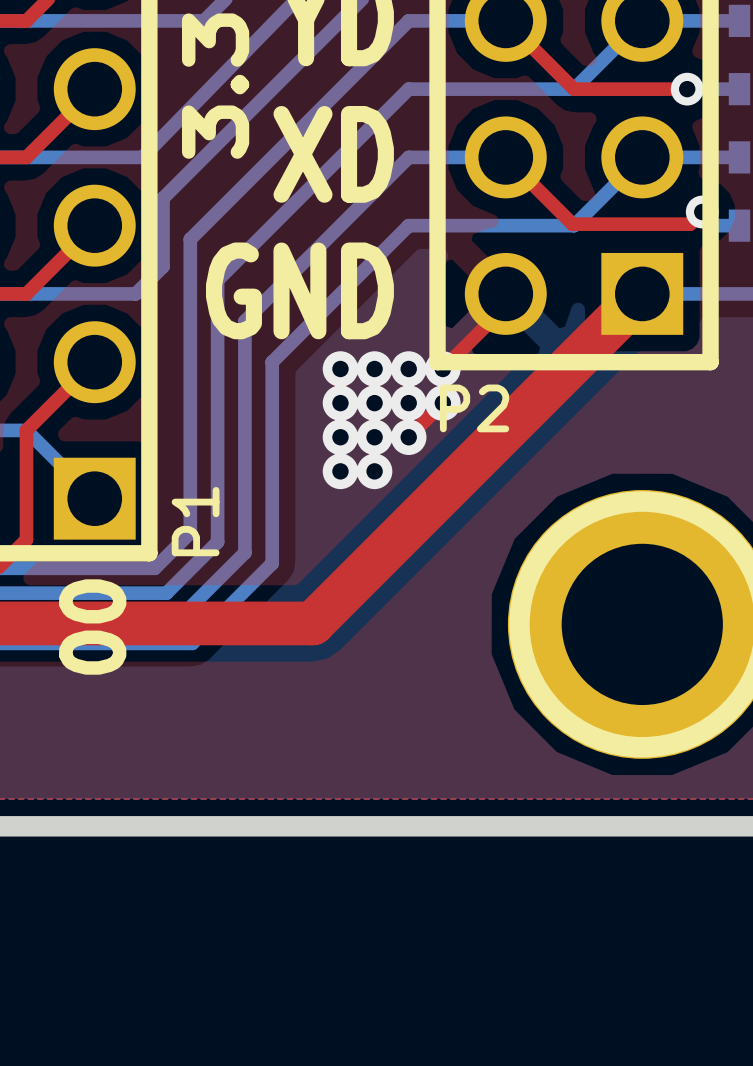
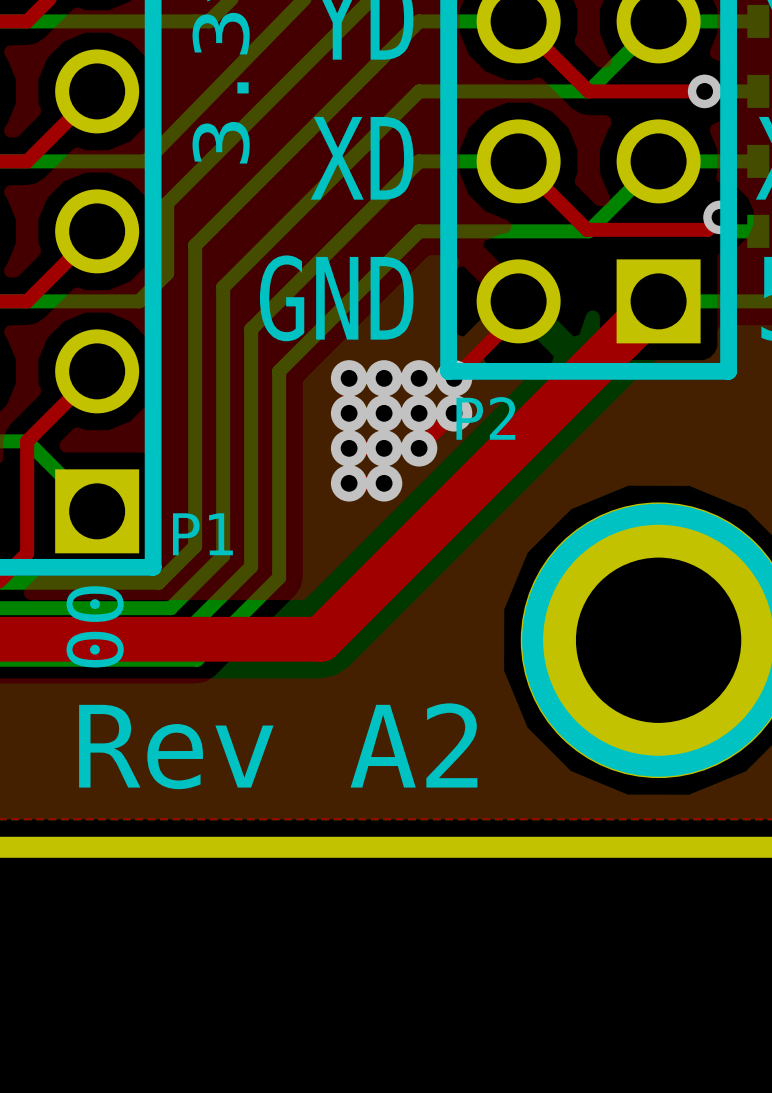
P1 name rotation: 0° (195, 521) -> 90° clockwise (202, 534)
text: none -> Rev A2 (278, 746)

